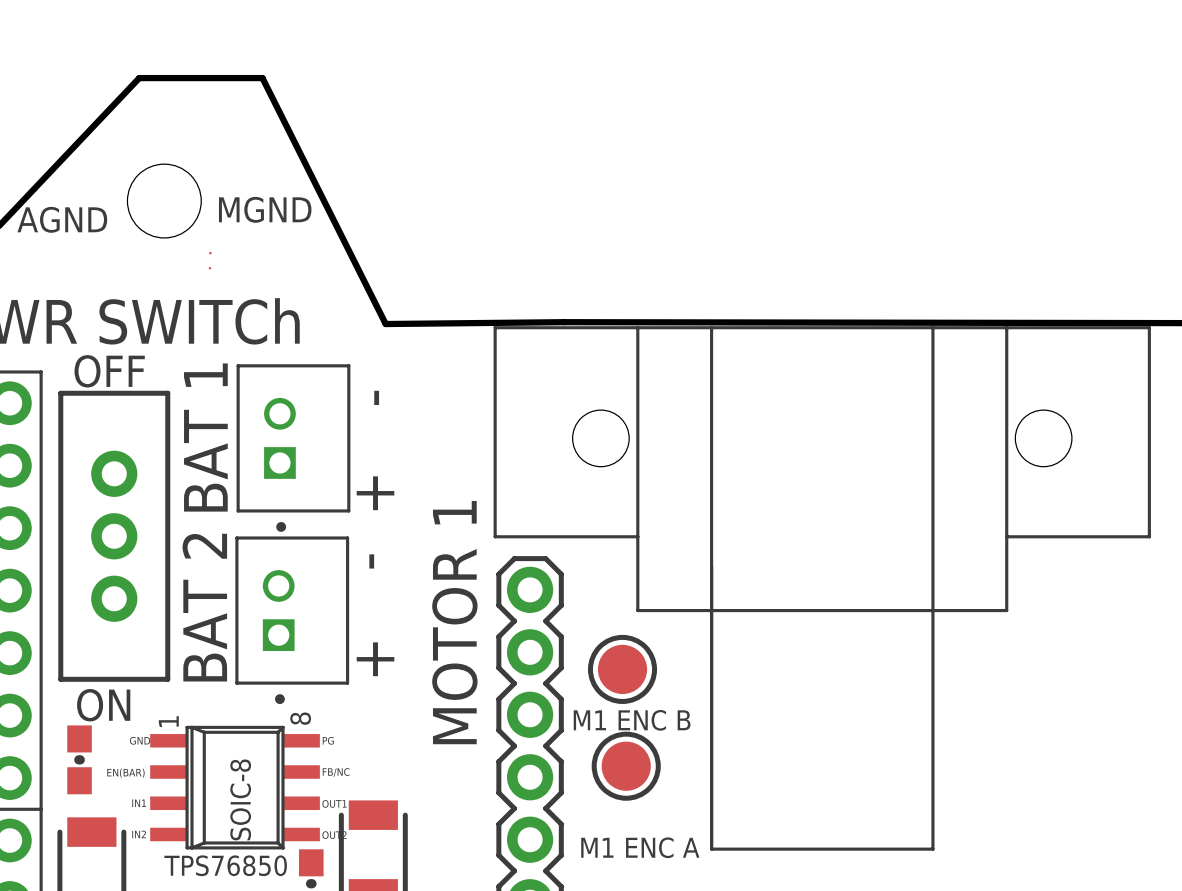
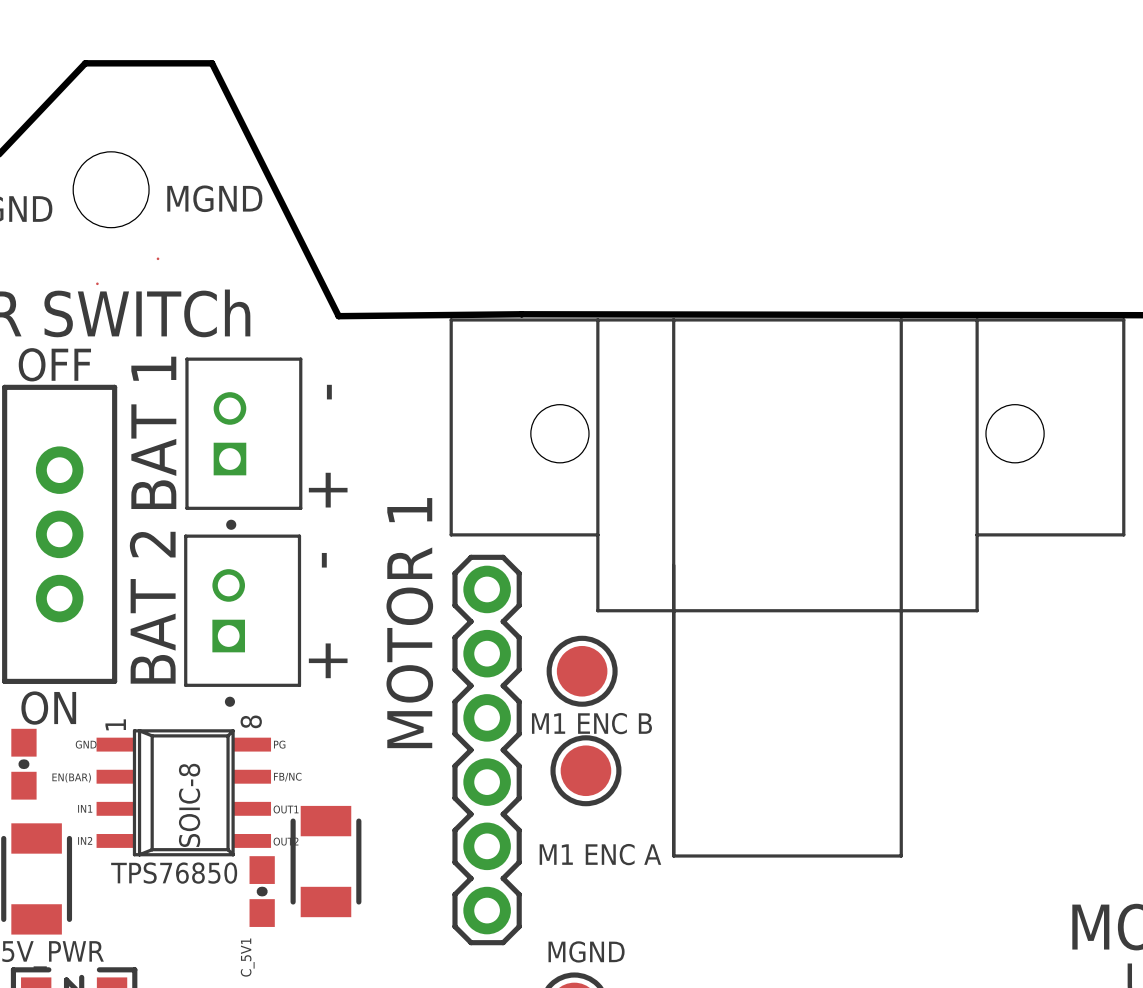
part position: (210, 253) -> (97, 283)

